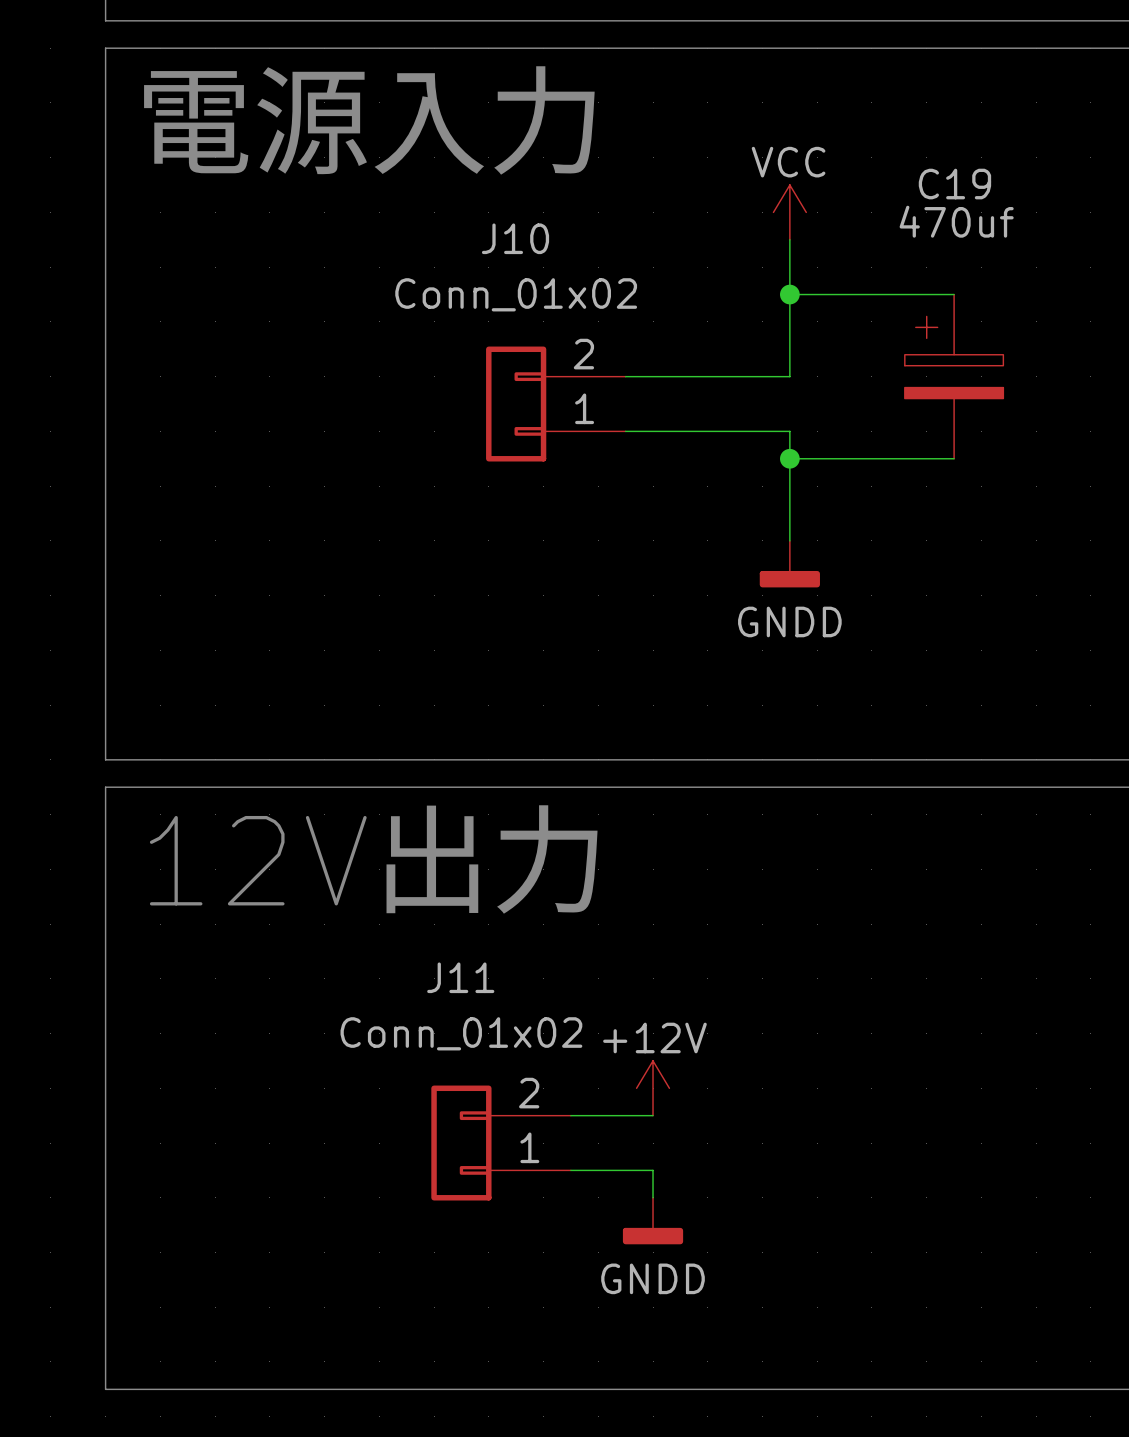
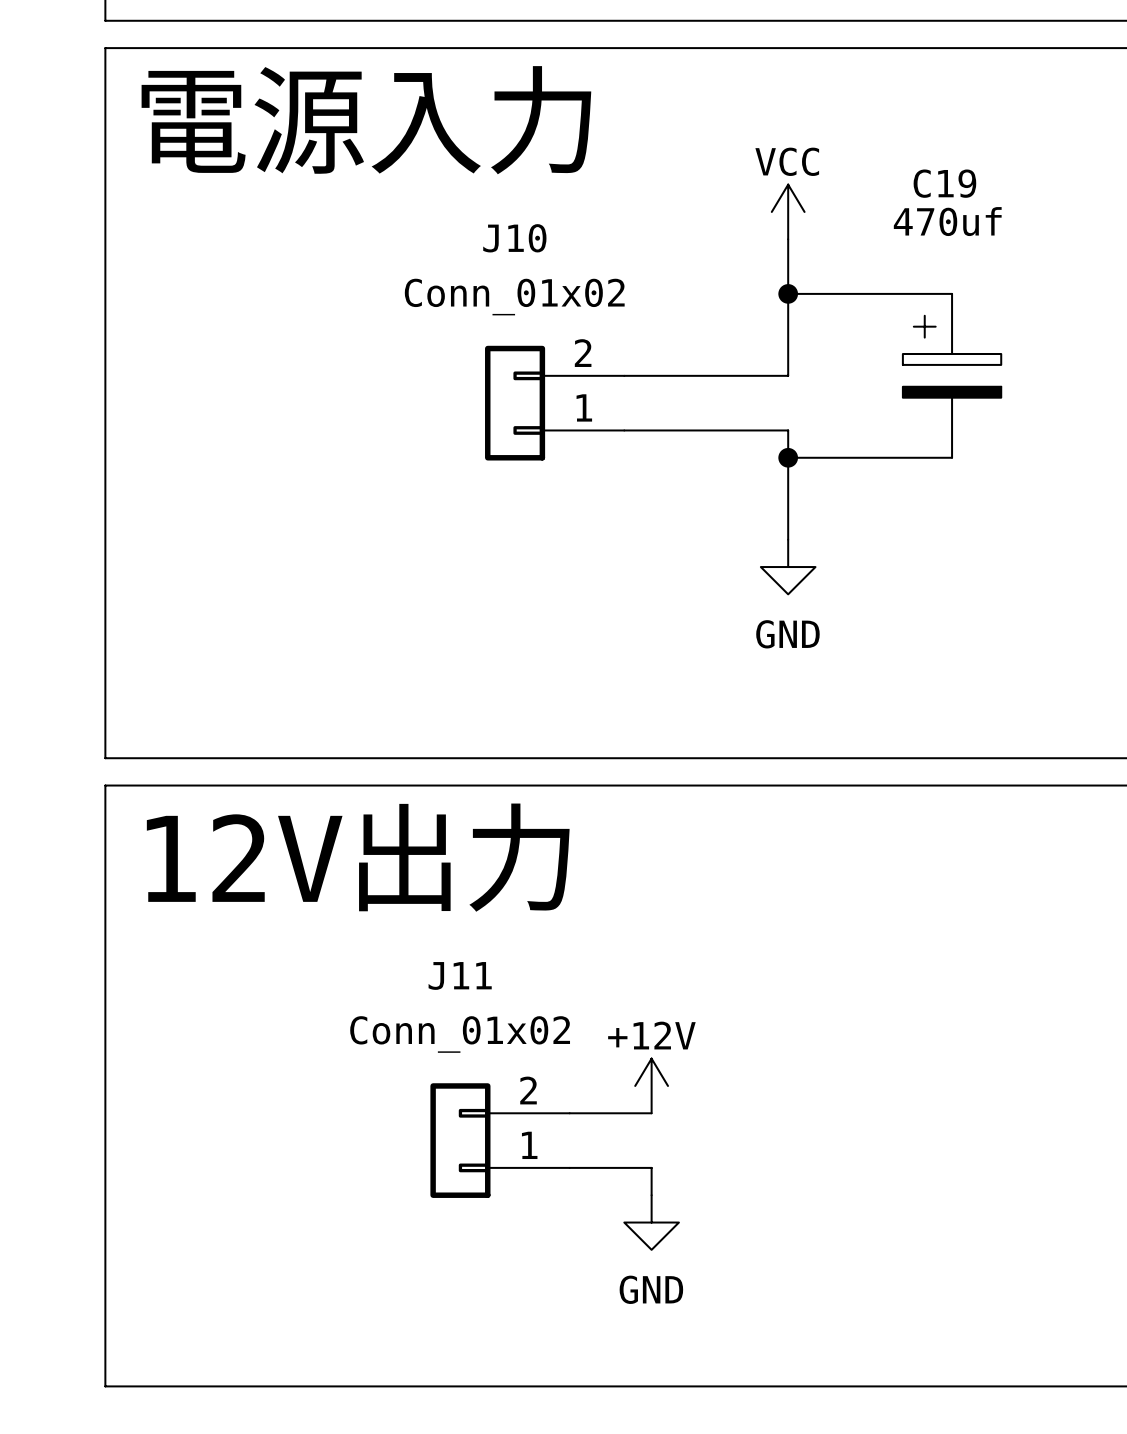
power symbol: GNDD (789, 564) -> GND (788, 567)
power symbol: GNDD (653, 1221) -> GND (651, 1222)

